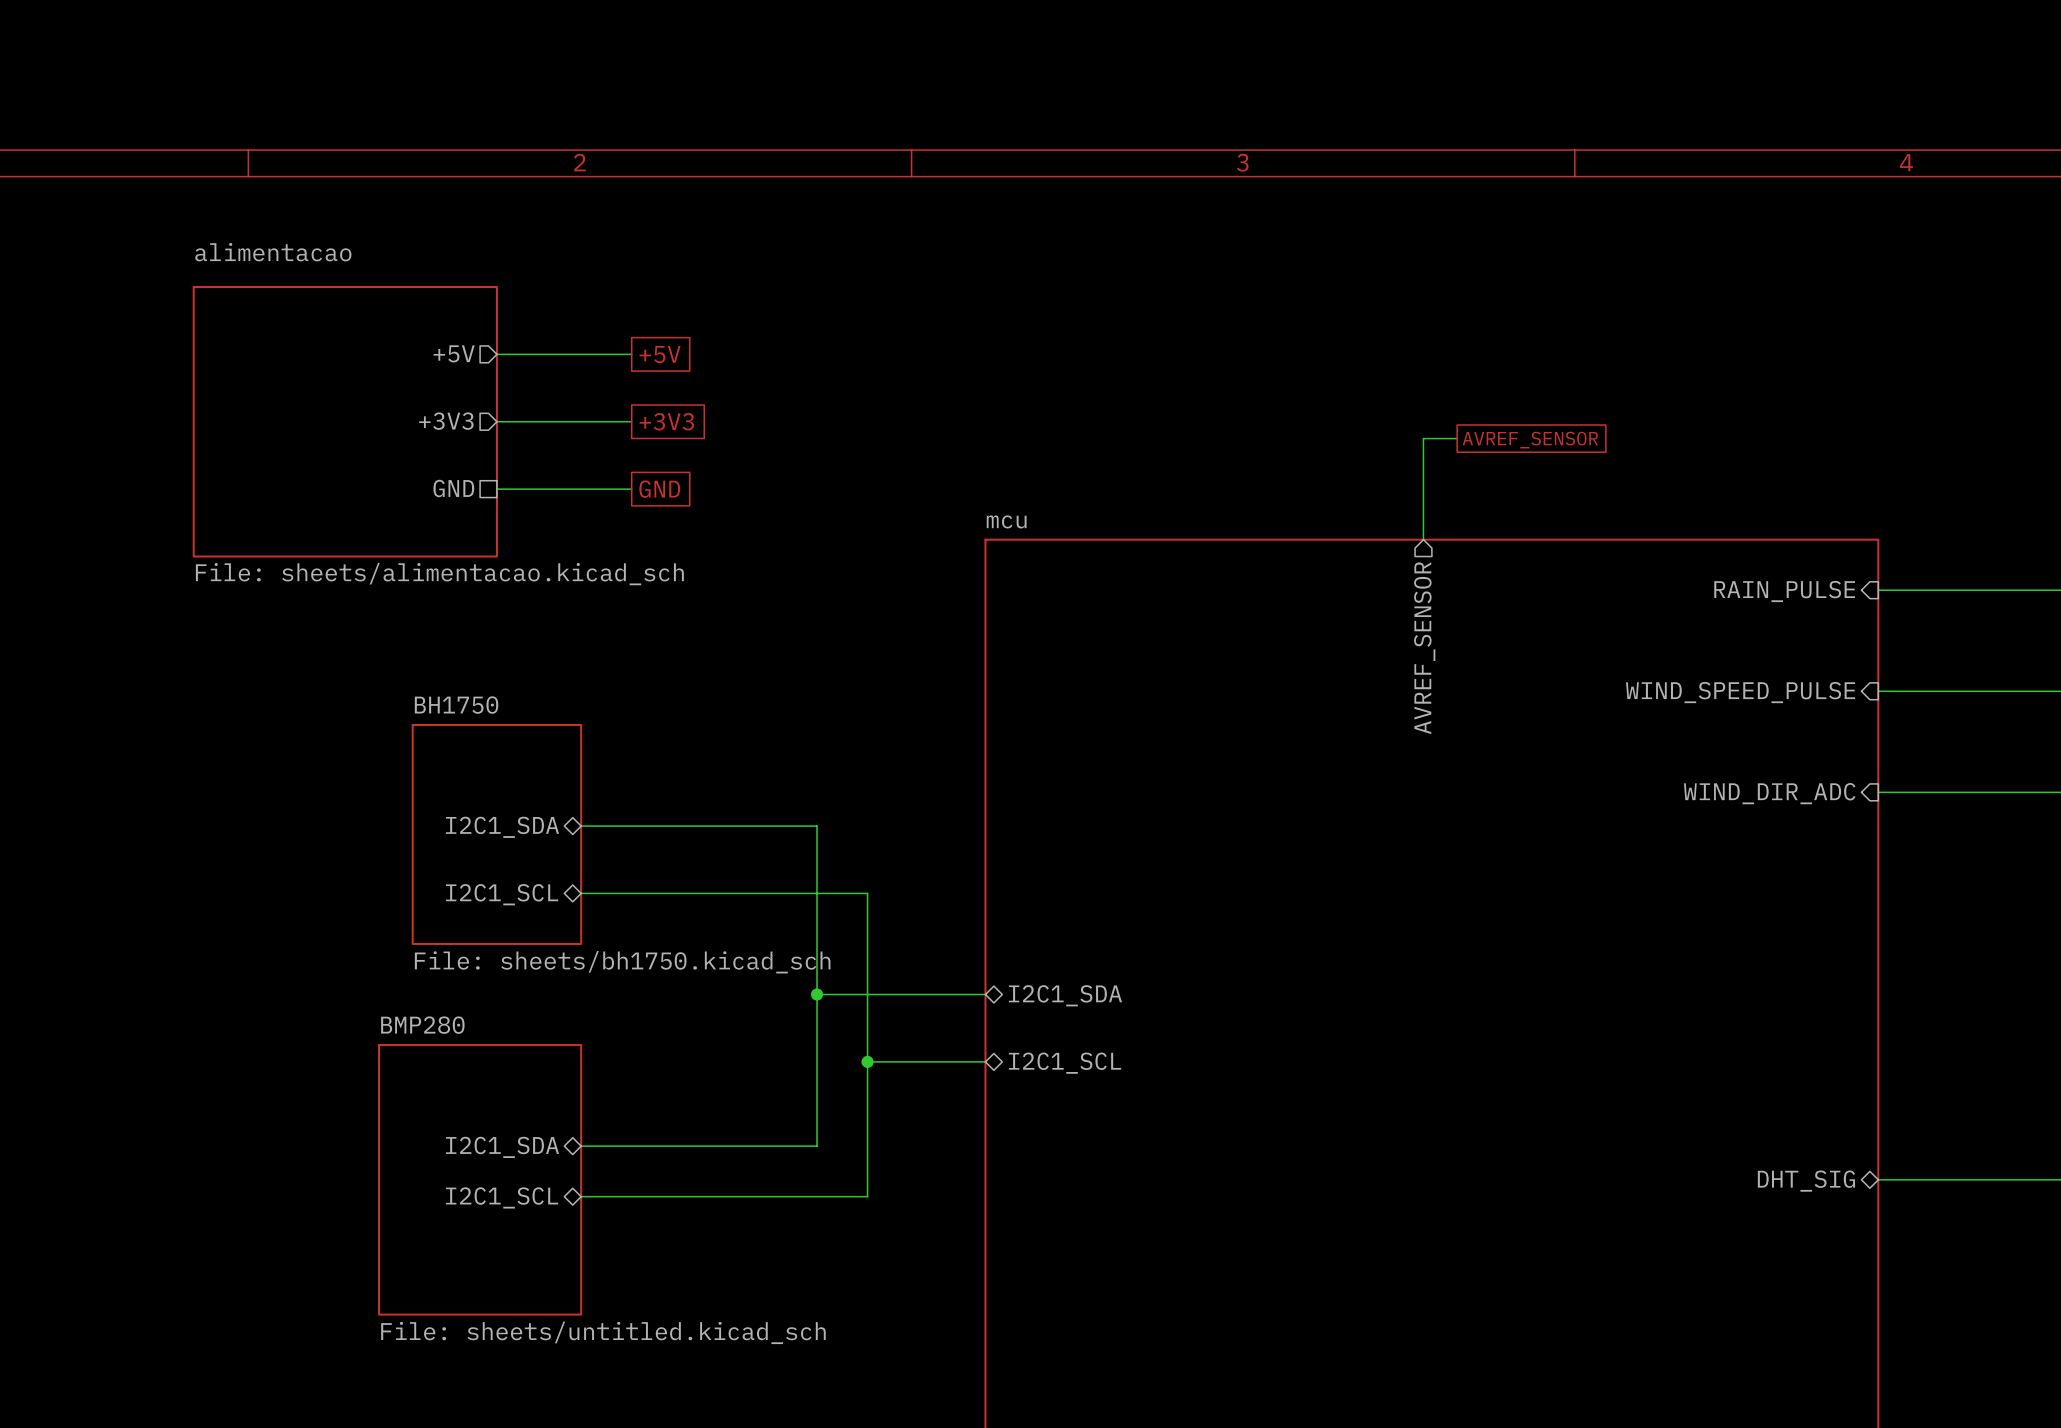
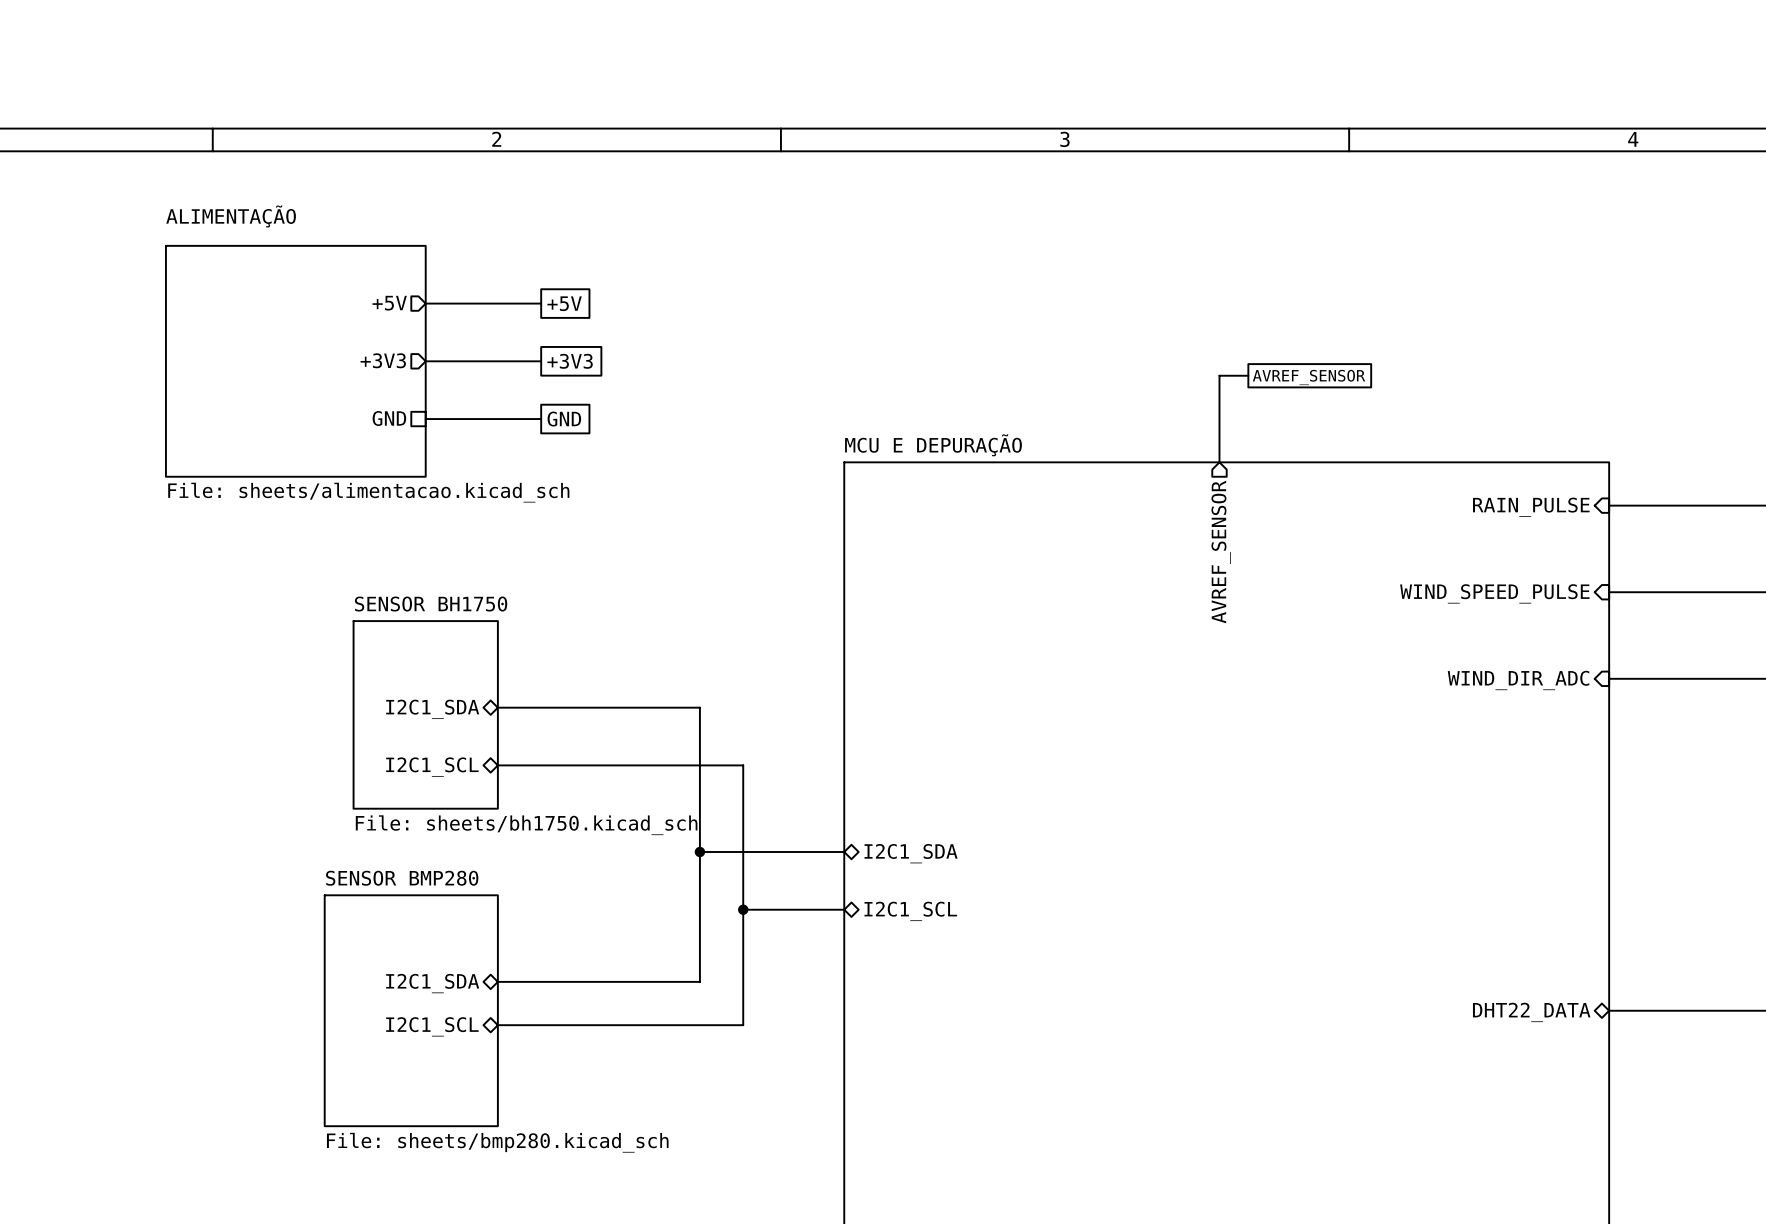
sheet alimentacao name: alimentacao (273, 252) -> ALIMENTAÇÃO (231, 216)
sheet mcu name: mcu (1006, 521) -> MCU E DEPURAÇÃO (933, 445)
sheet BH1750 name: BH1750 (456, 705) -> SENSOR BH1750 (431, 604)
sheet BMP280 name: BMP280 (422, 1025) -> SENSOR BMP280 (402, 878)
sheet pin: DHT_SIG (1806, 1181) -> DHT22_DATA (1531, 1012)
sheet BMP280 value: File: sheets/untitled.kicad_sch (603, 1332) -> File: sheets/bmp280.kicad_sch (497, 1142)

